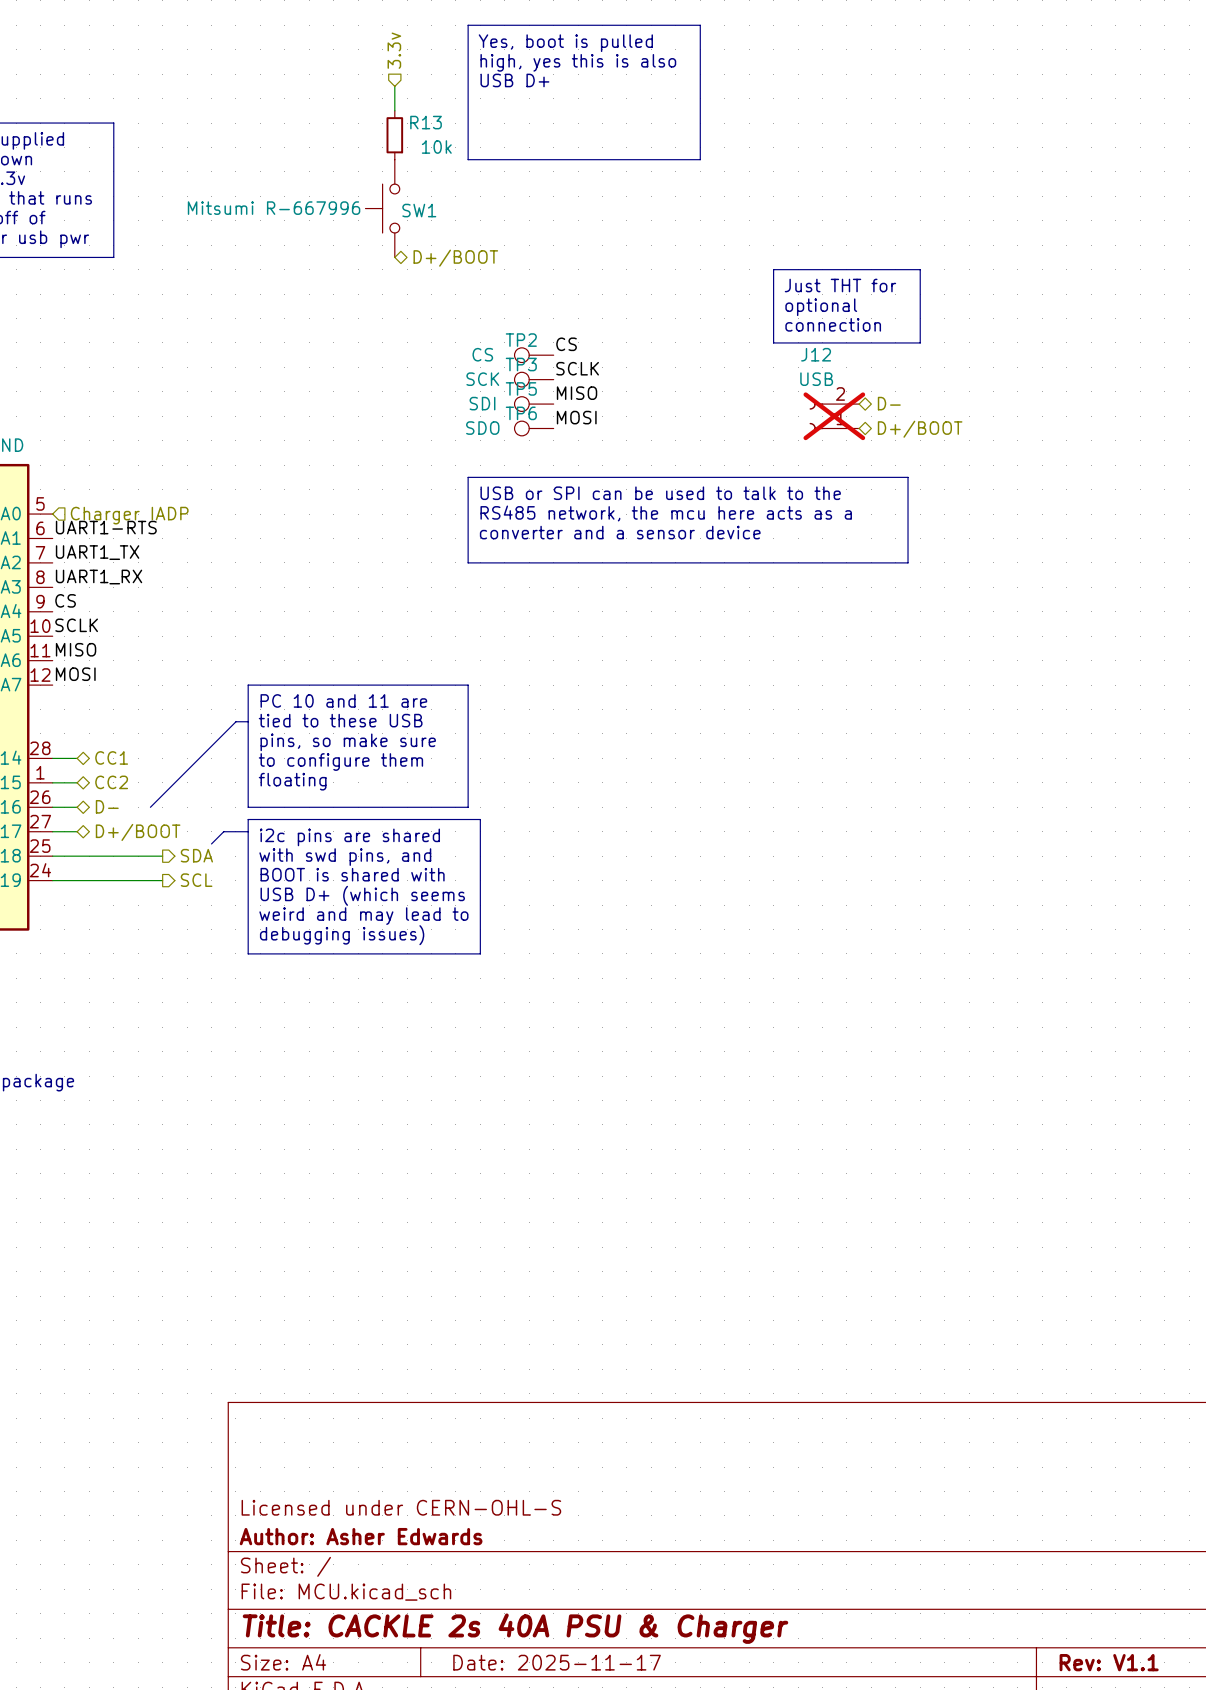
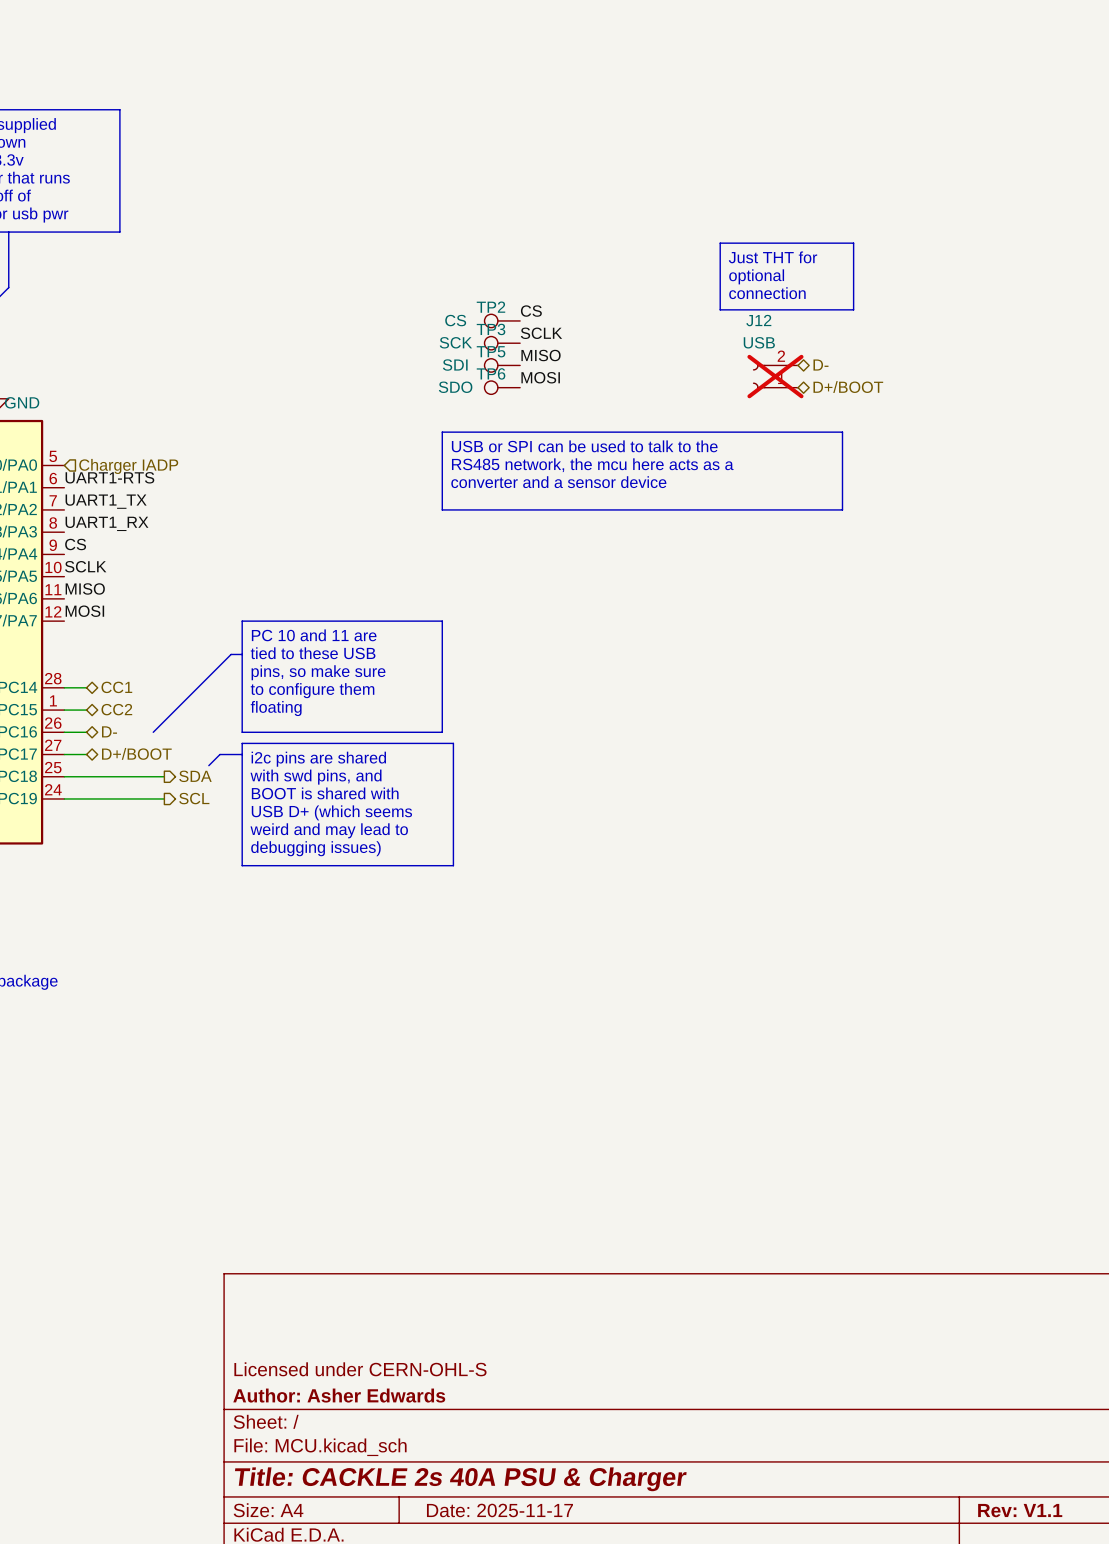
line: (468, 25) (700, 25) (700, 159) (468, 159) (468, 25) -> none
text: Yes, boot is pulled (565, 43) -> none
hierarchical label: 3.3v (394, 50) -> none
text: high, yes this is also (578, 62) -> none
text: USB D+ (514, 80) -> none
wire: (394, 86) (394, 110) -> none
R13: 10k (394, 135) -> none
SW1: Mitsumi R-667996 (382, 208) -> none
hierarchical label: D+/BOOT (455, 258) -> none

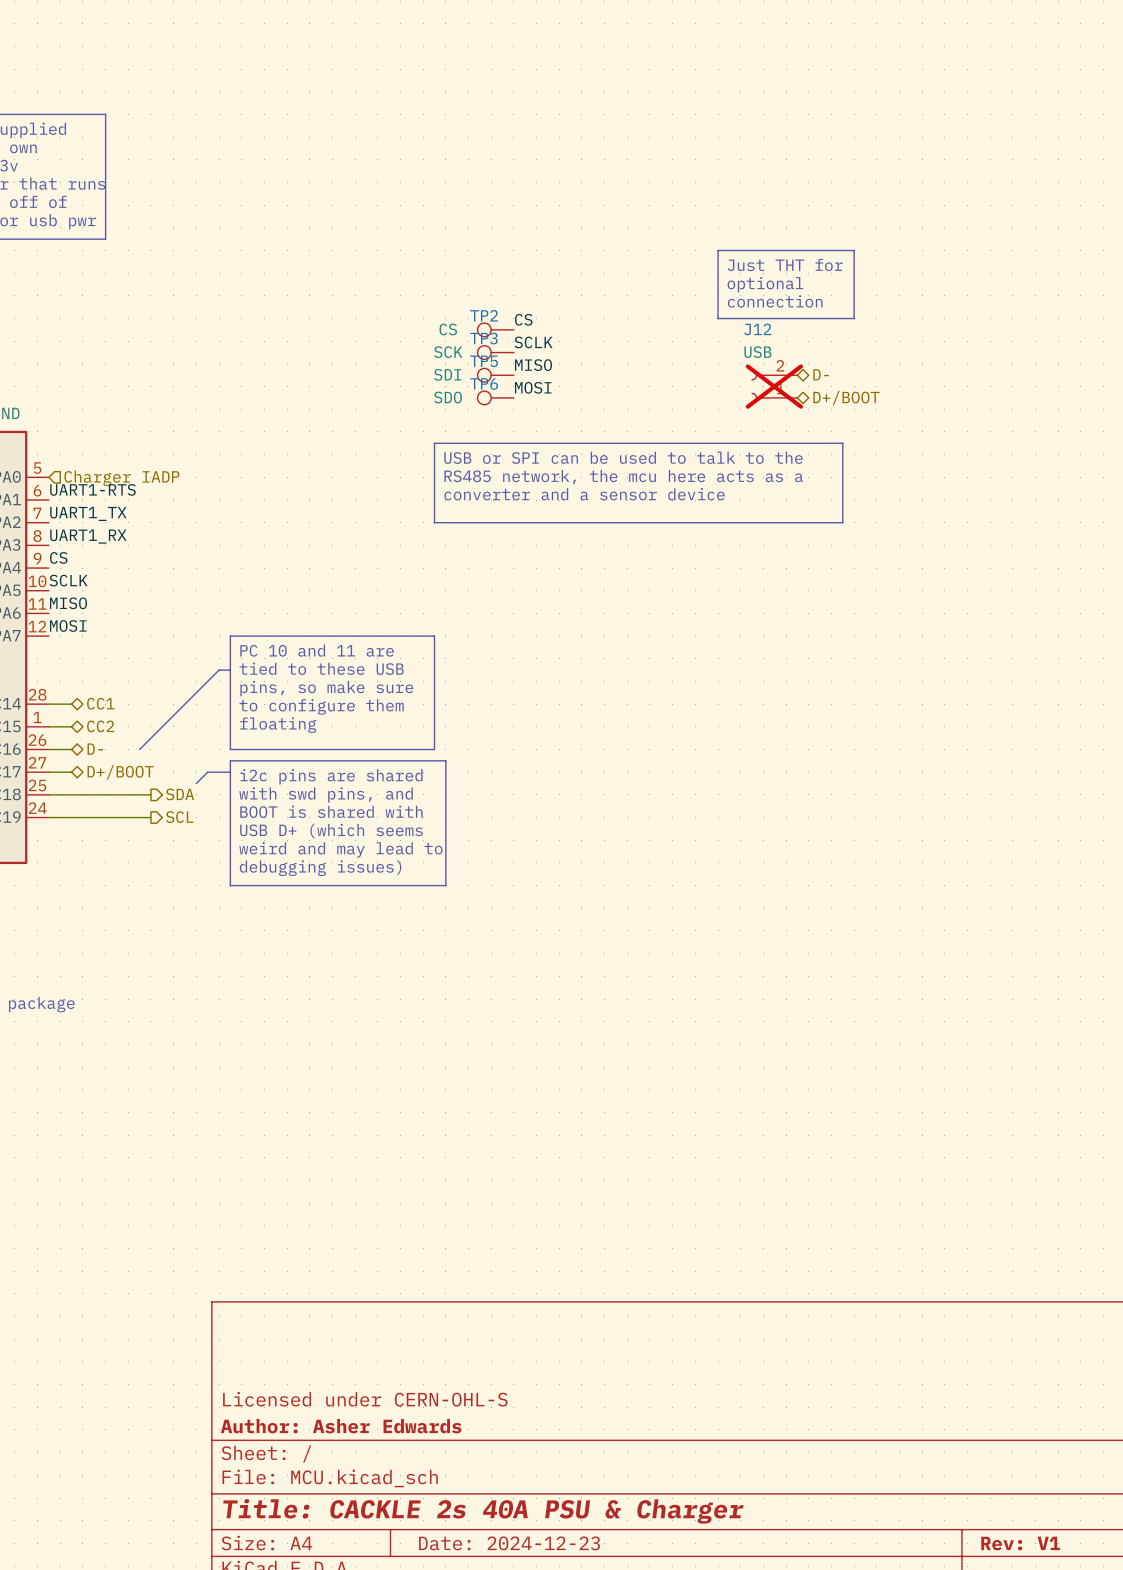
title block: Date: 2025-11-17 (499, 1510) -> Date: 2024-12-23 (509, 1543)
title block: Rev: V1.1 (1020, 1510) -> Rev: V1 (1020, 1543)

